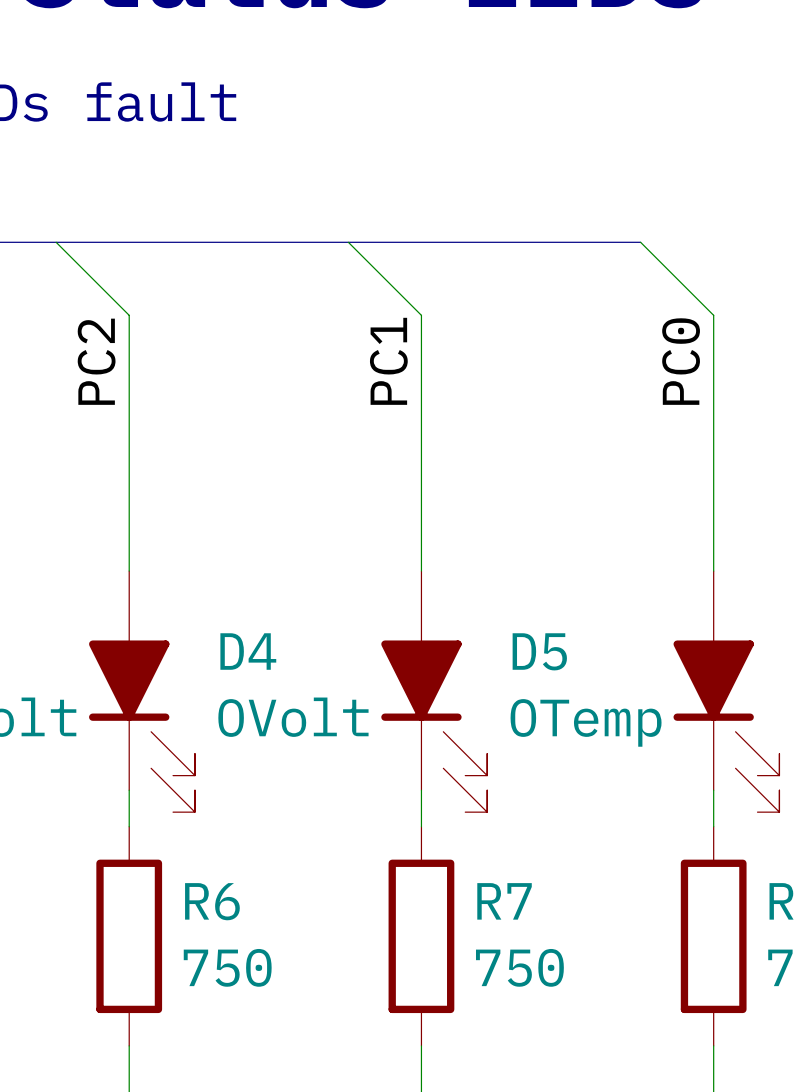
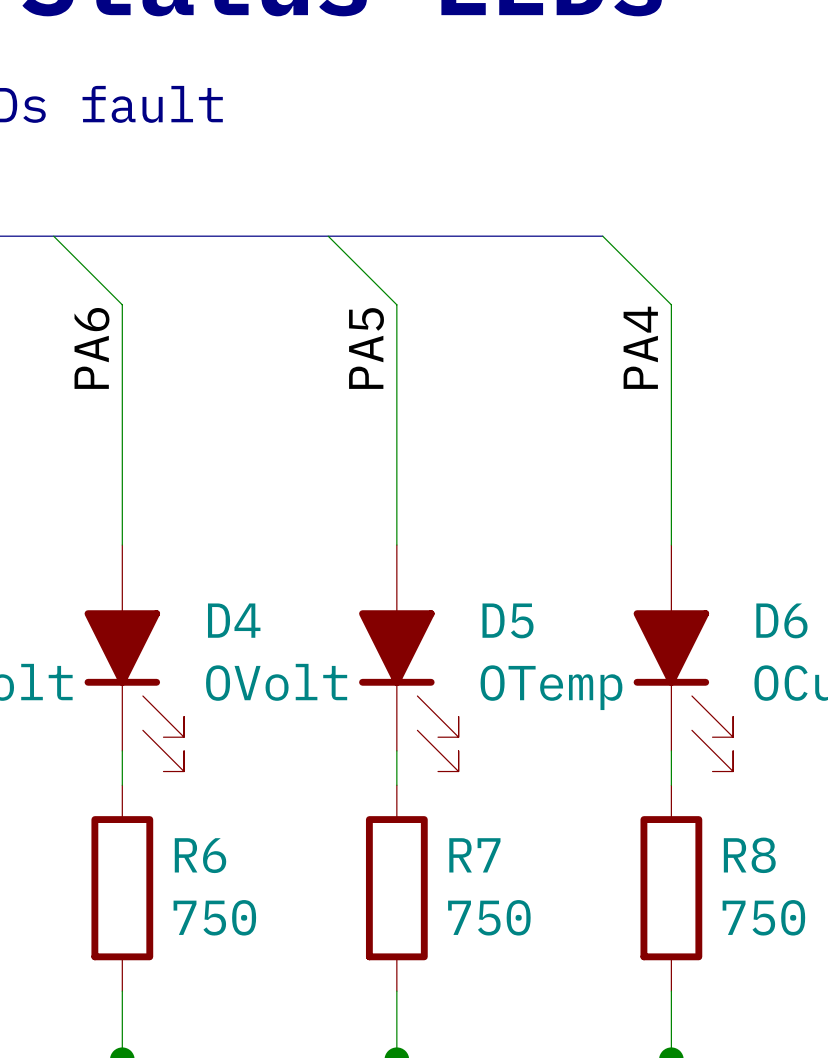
label: PC2 (96, 361) -> PA6 (91, 348)
label: PC1 (388, 361) -> PA5 (366, 348)
label: PC0 (681, 361) -> PA4 (640, 347)

